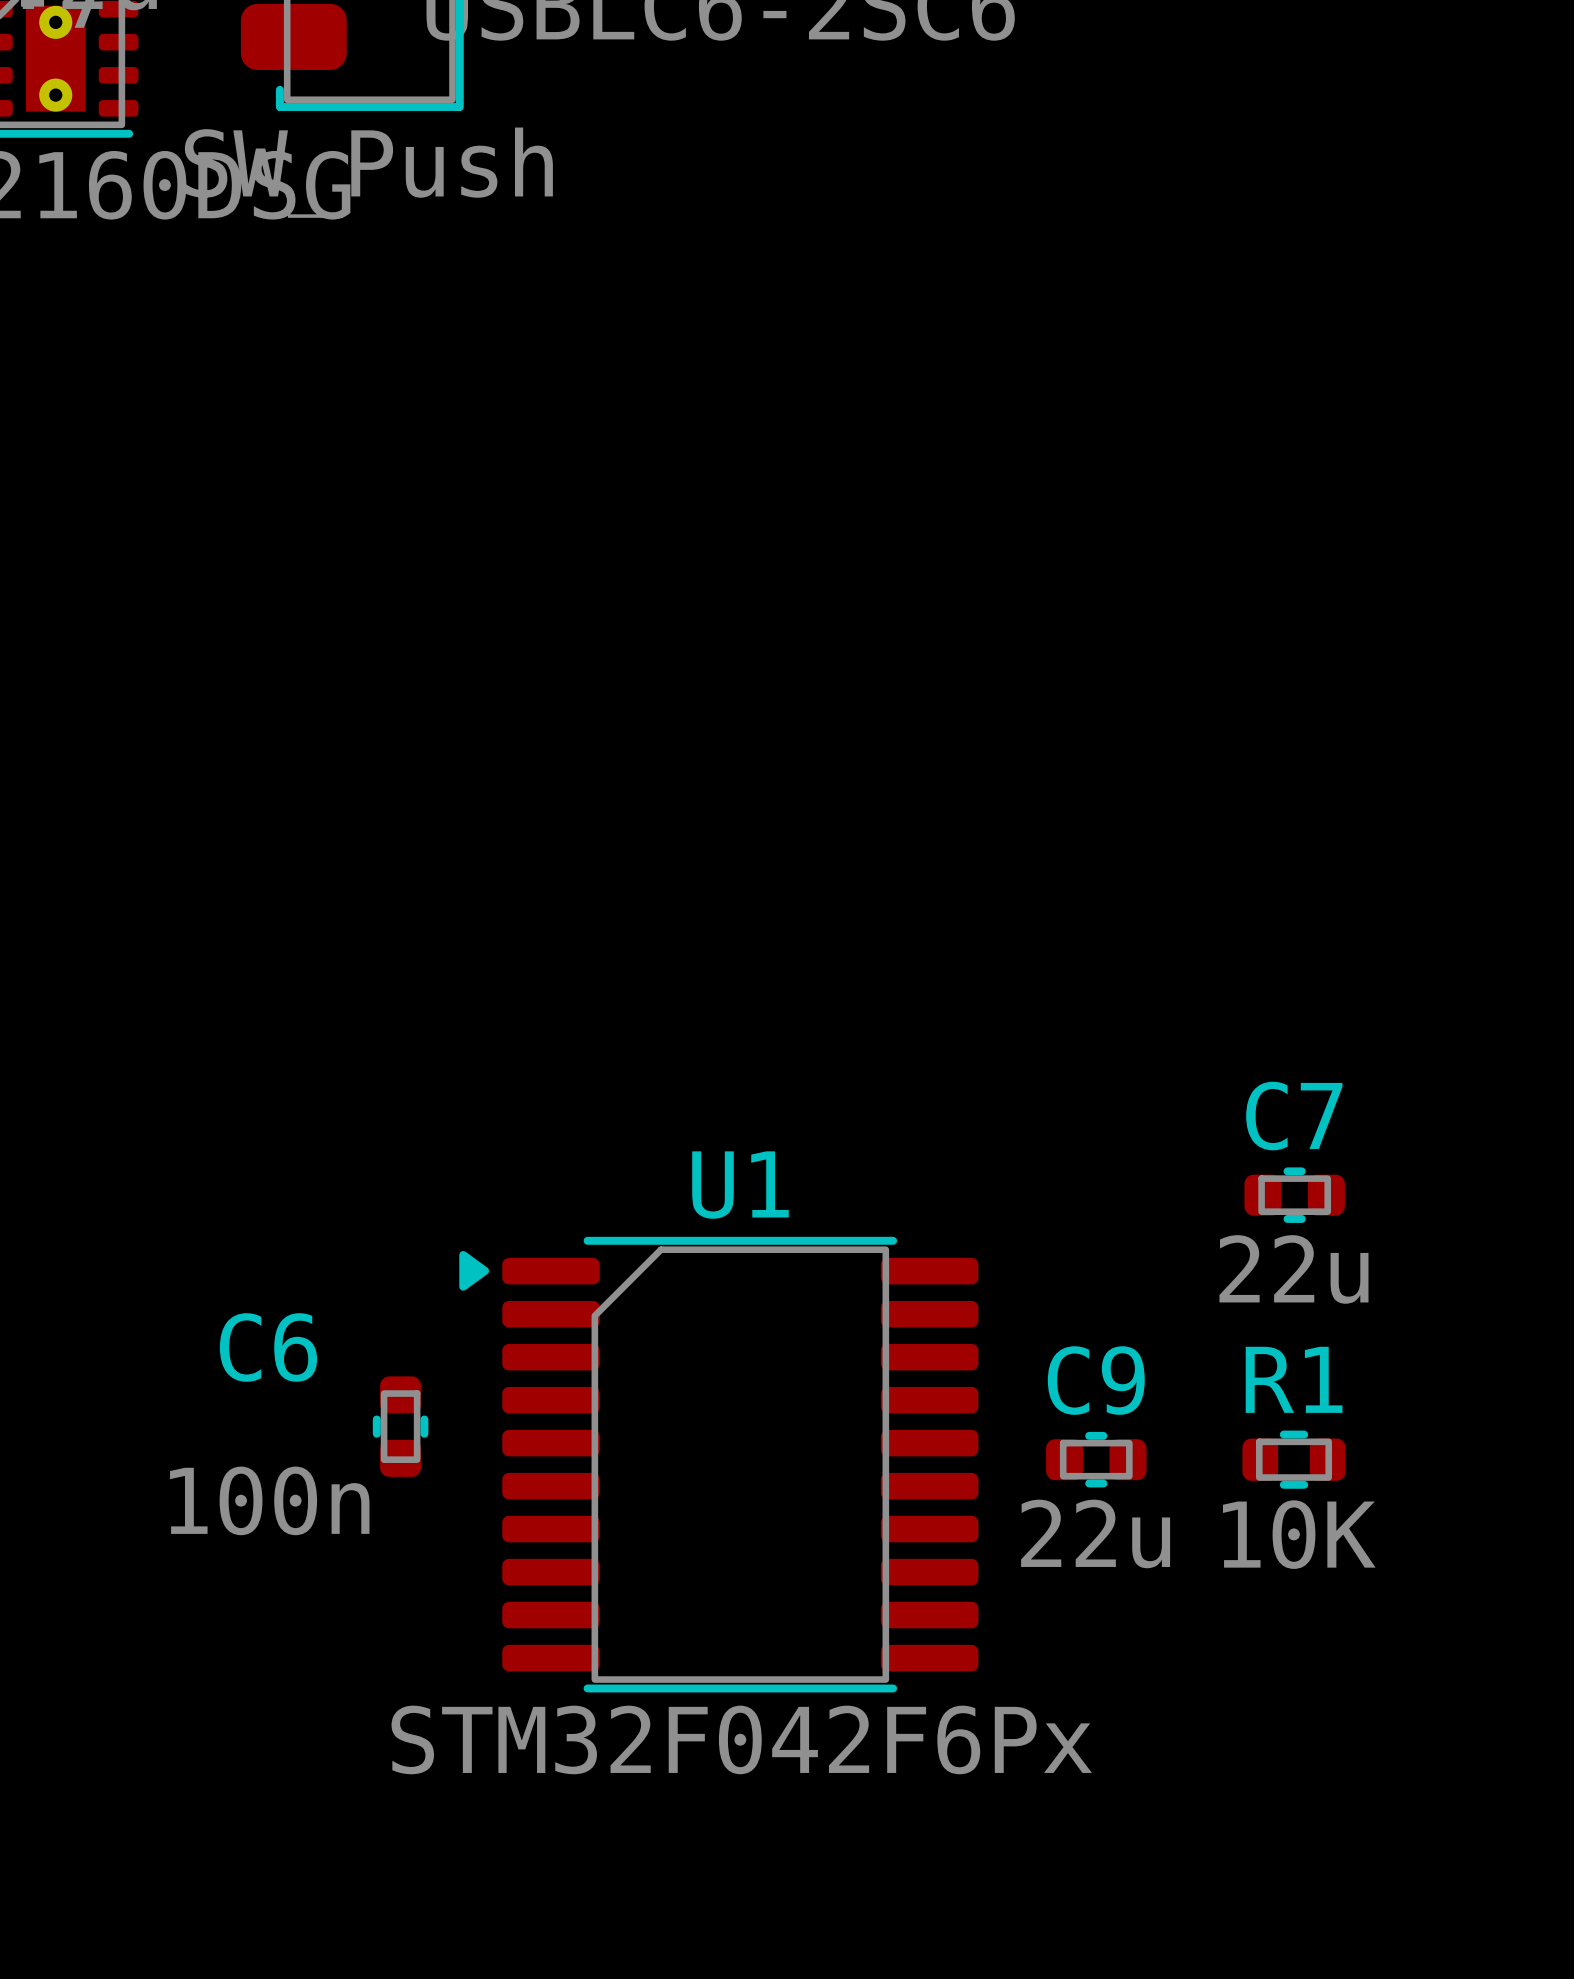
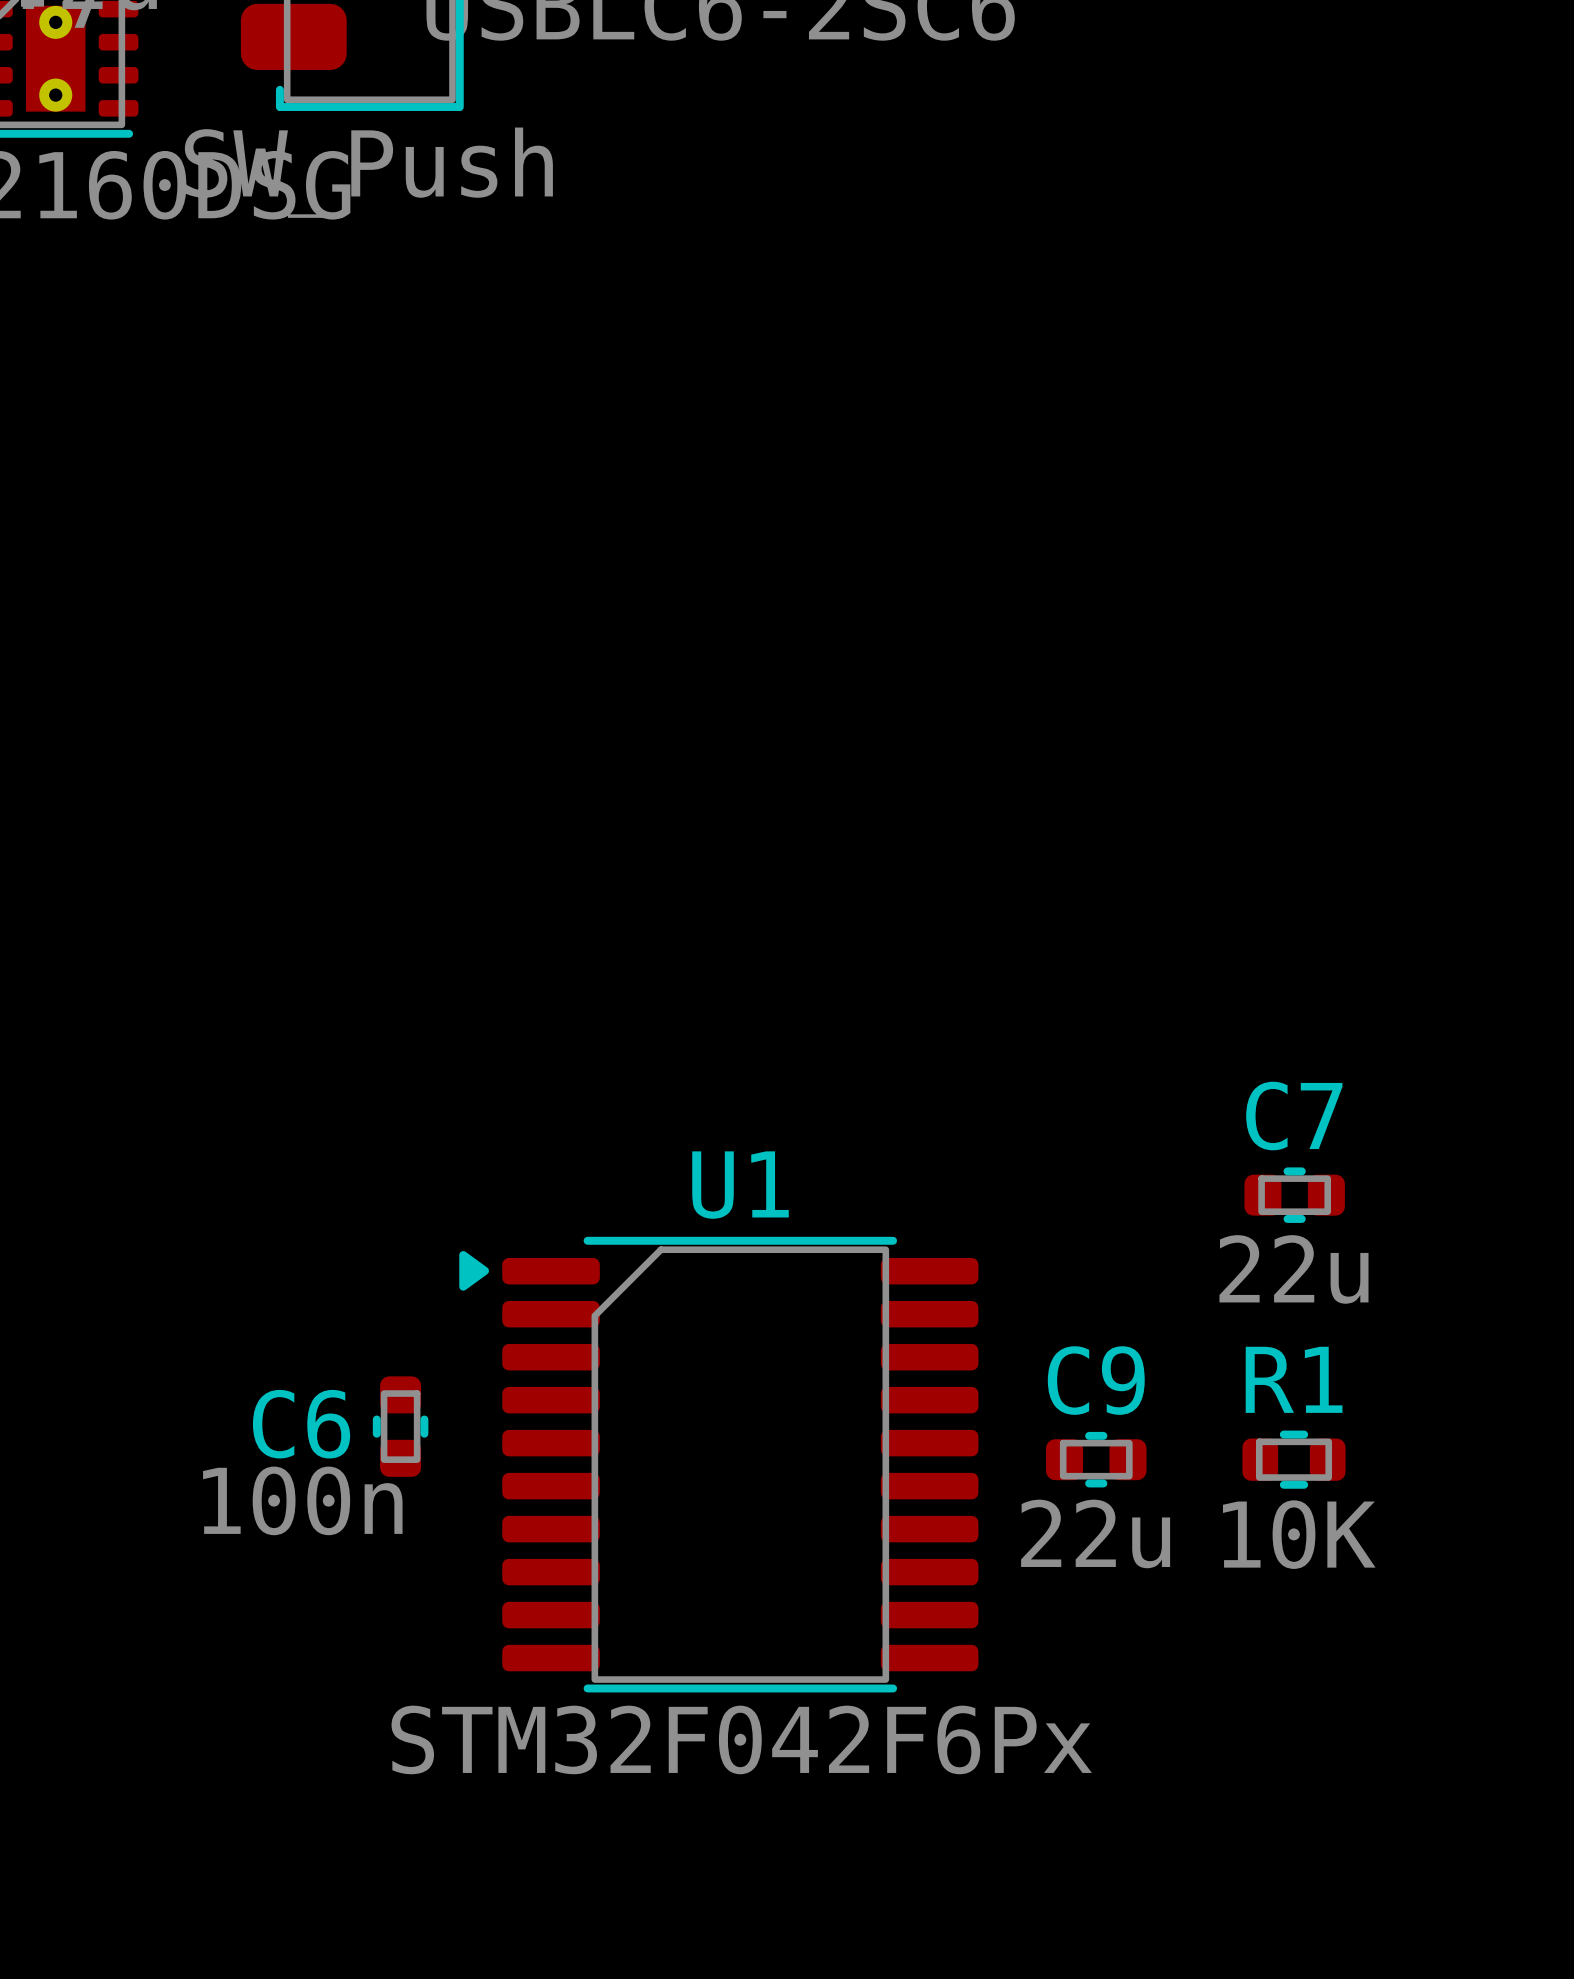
C6 name position: C6 (268, 1347) -> C6 (301, 1424)
C6 value position: 100n (269, 1500) -> 100n (302, 1500)

